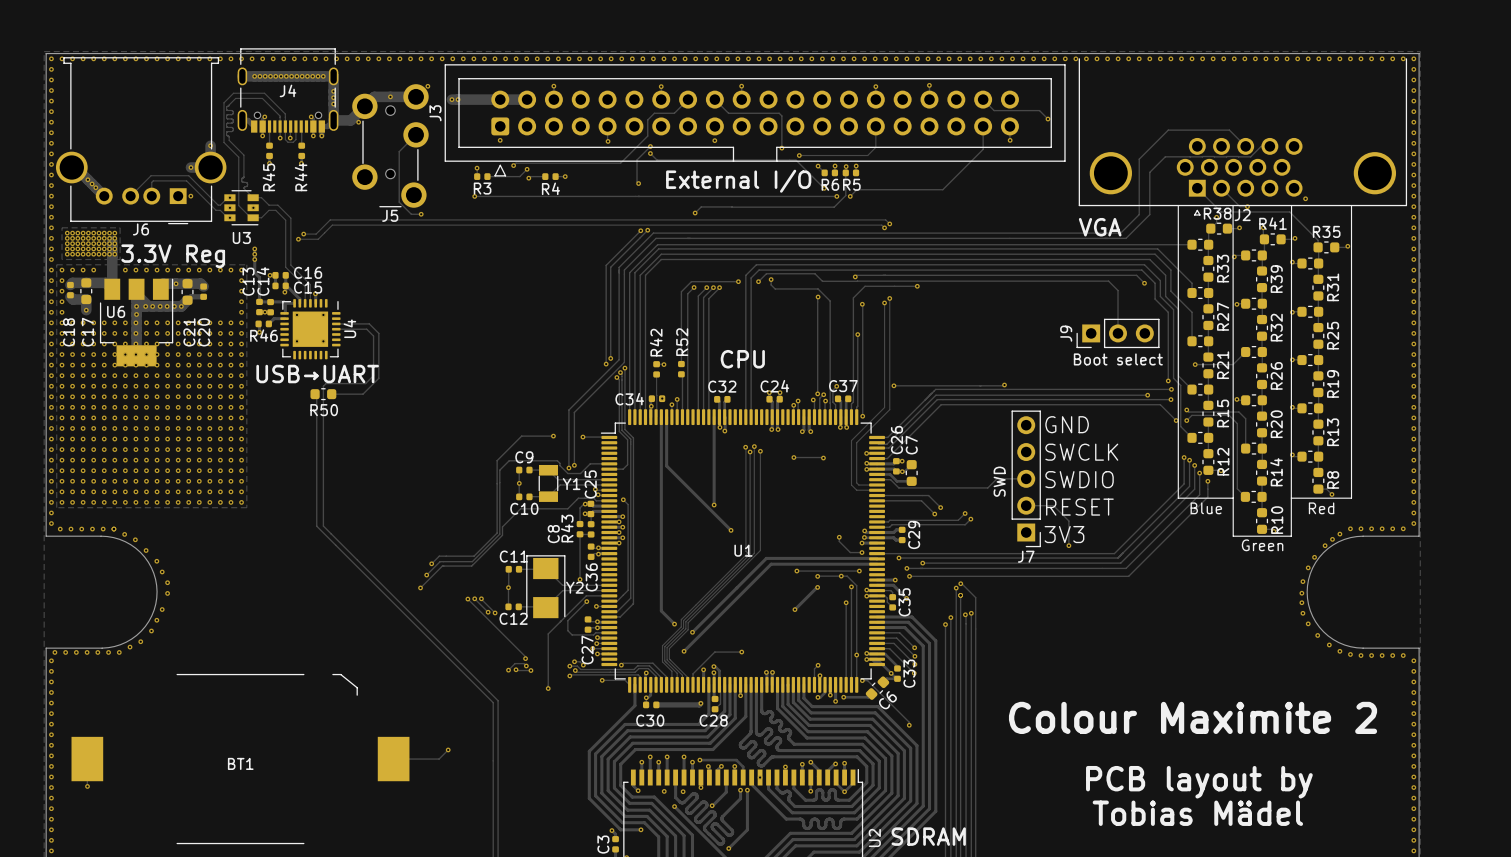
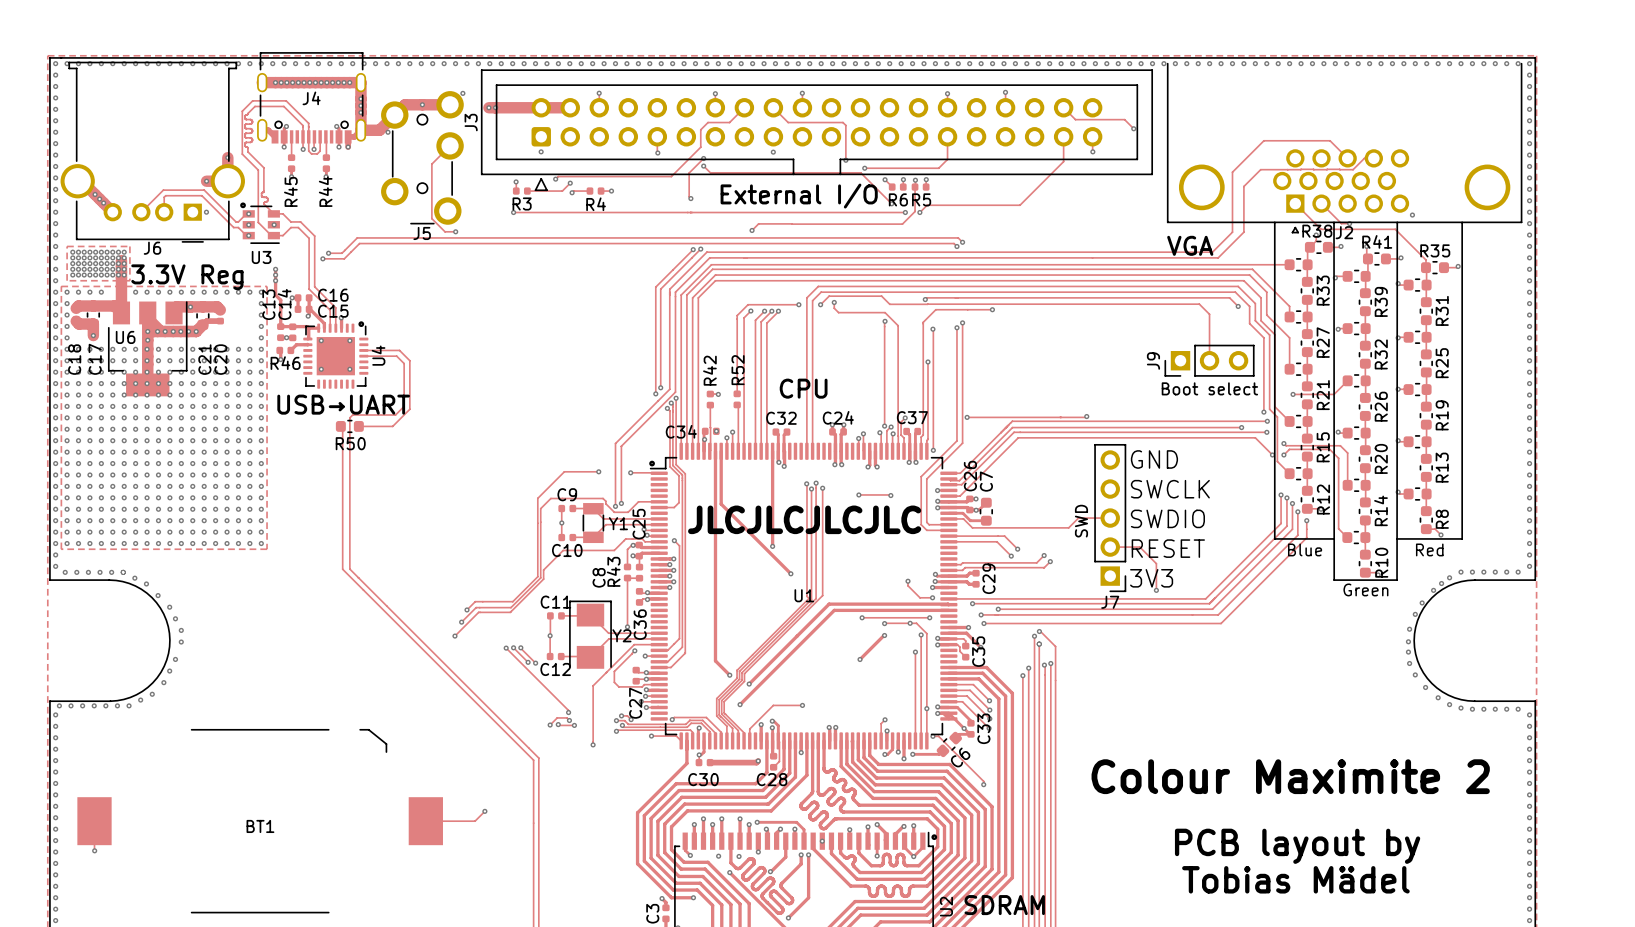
drawing: none -> [240, 202, 246, 209]
drawing: none -> [358, 321, 365, 328]
drawing: none -> [649, 460, 655, 467]
text: none -> JLCJLCJLCJLC (804, 519)
drawing: none -> [931, 834, 938, 841]

